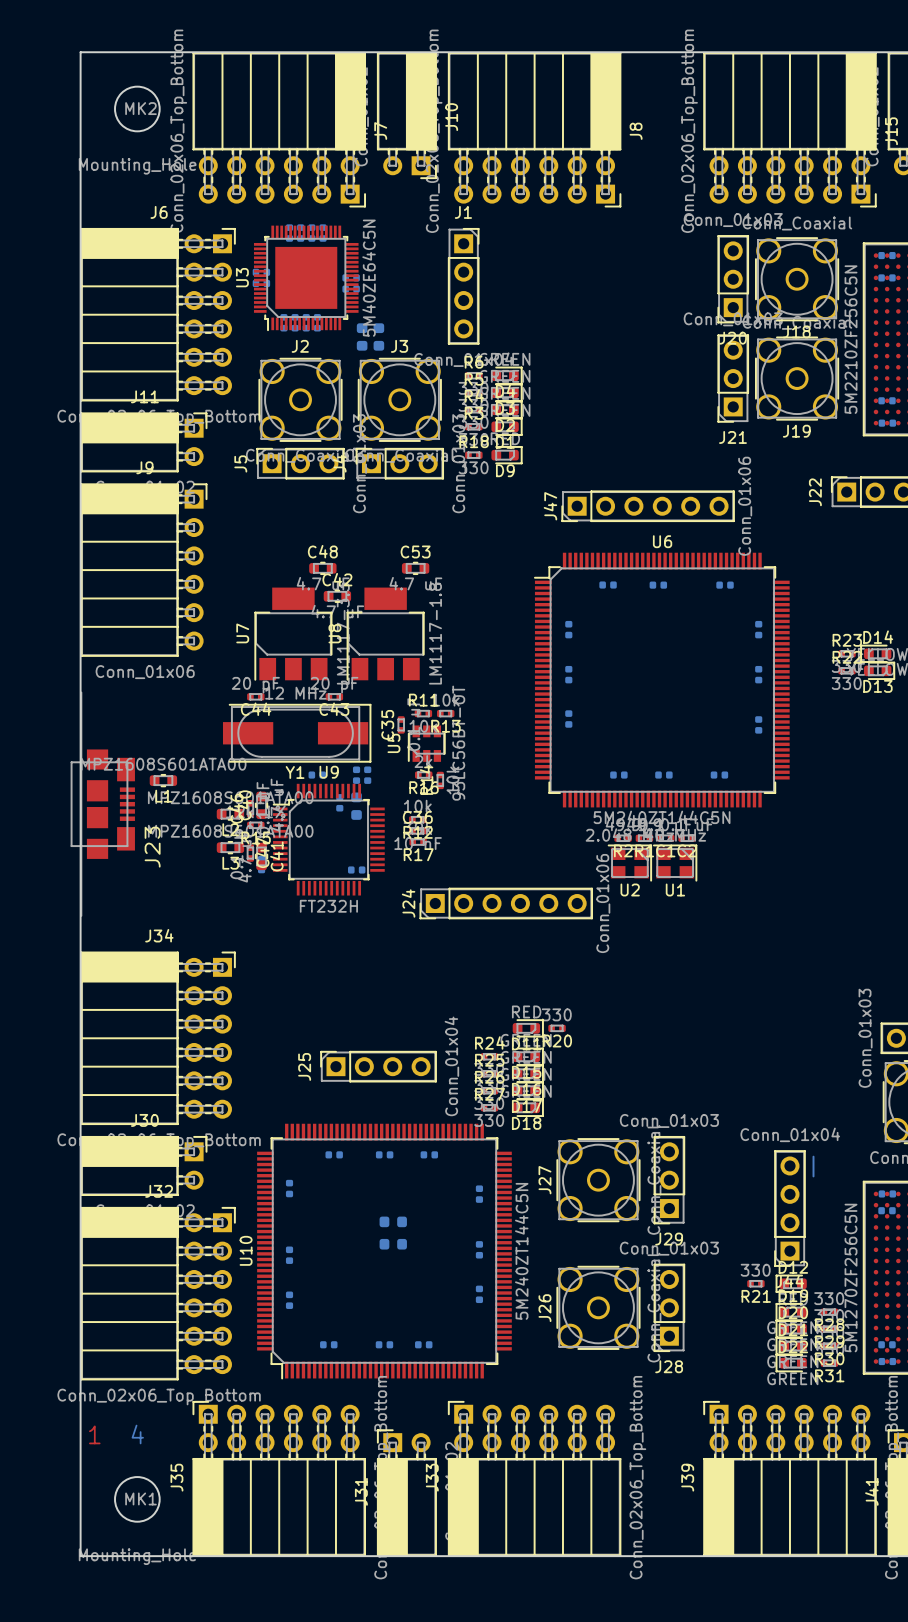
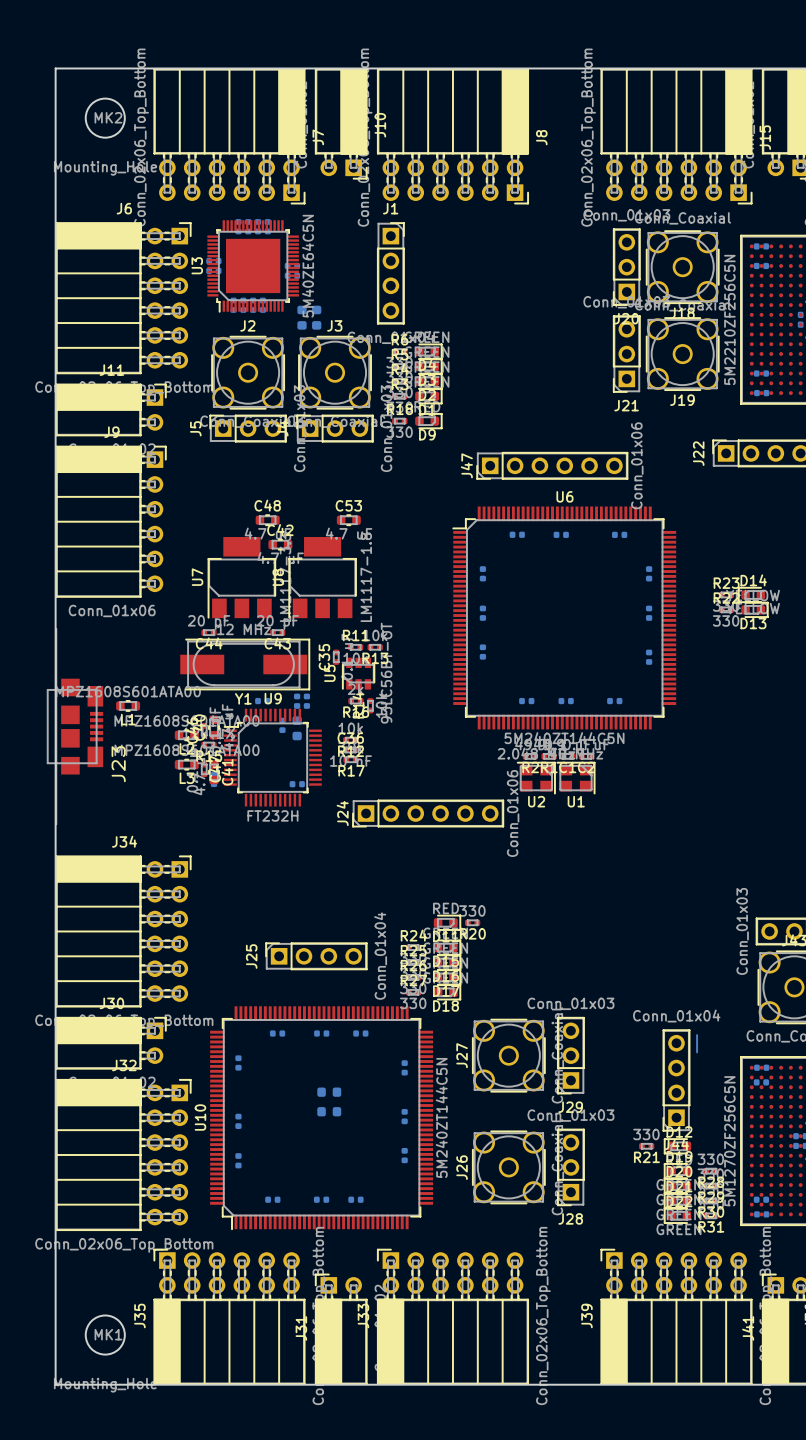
text: 1 (94, 1434) -> none
text: 4 (137, 1434) -> none

